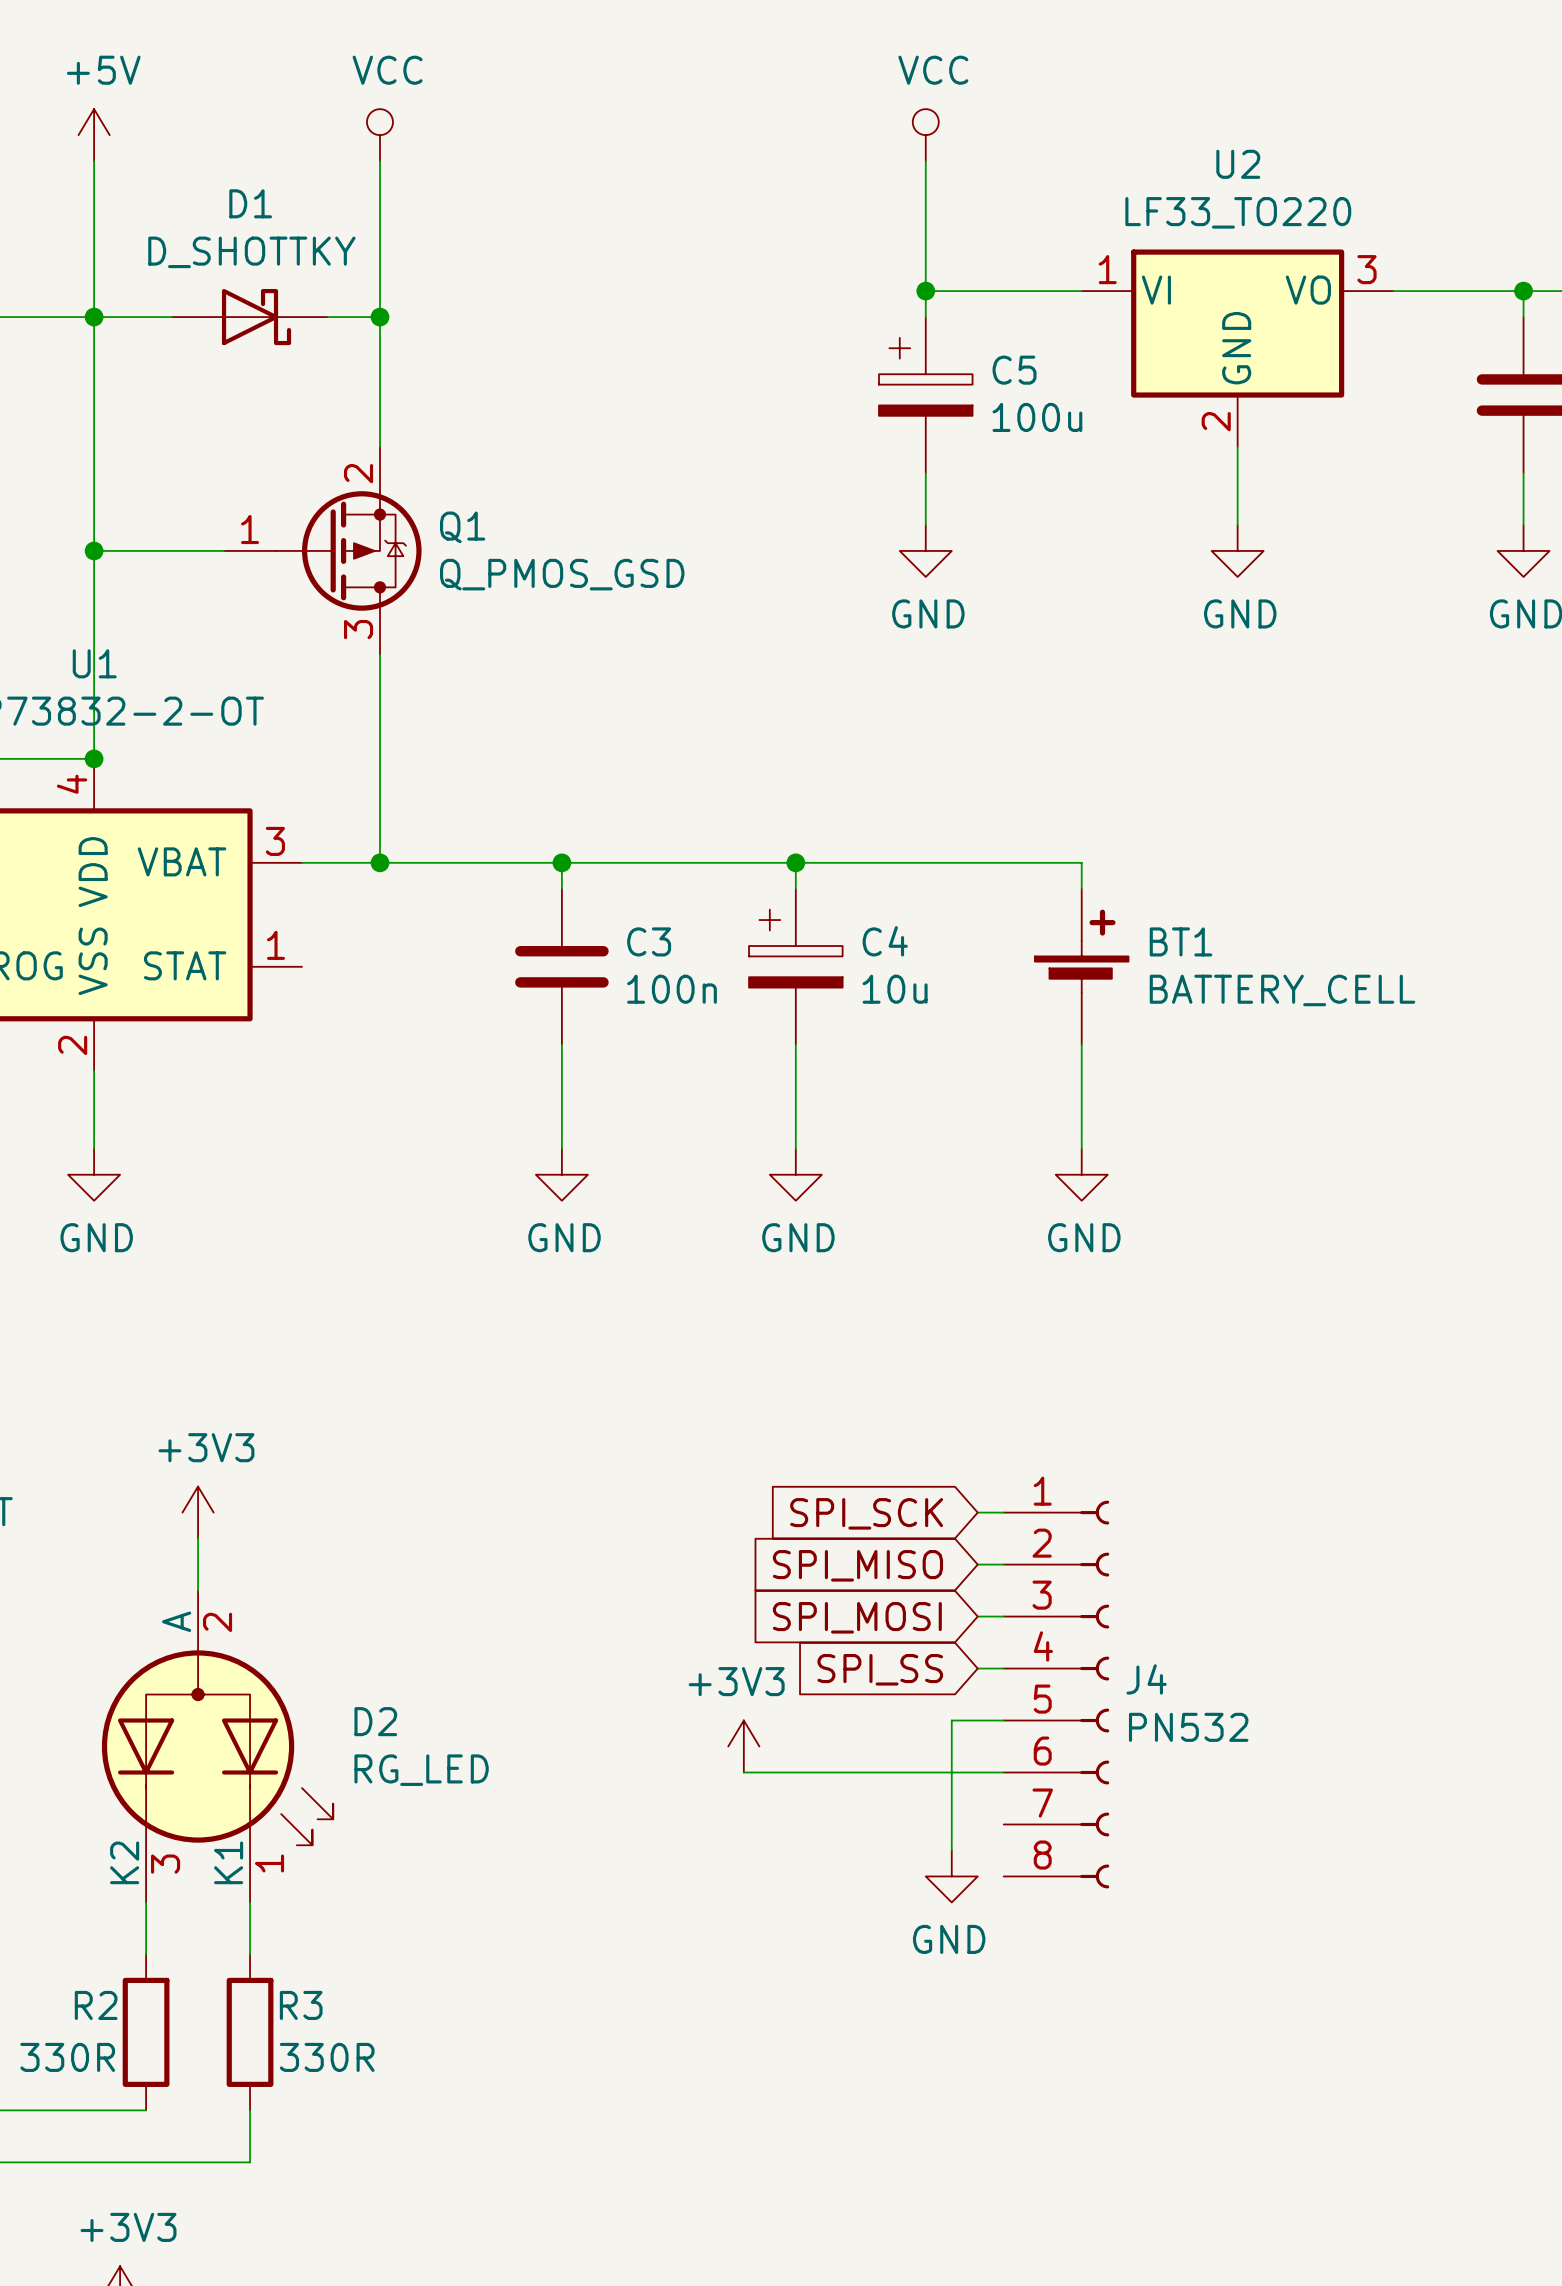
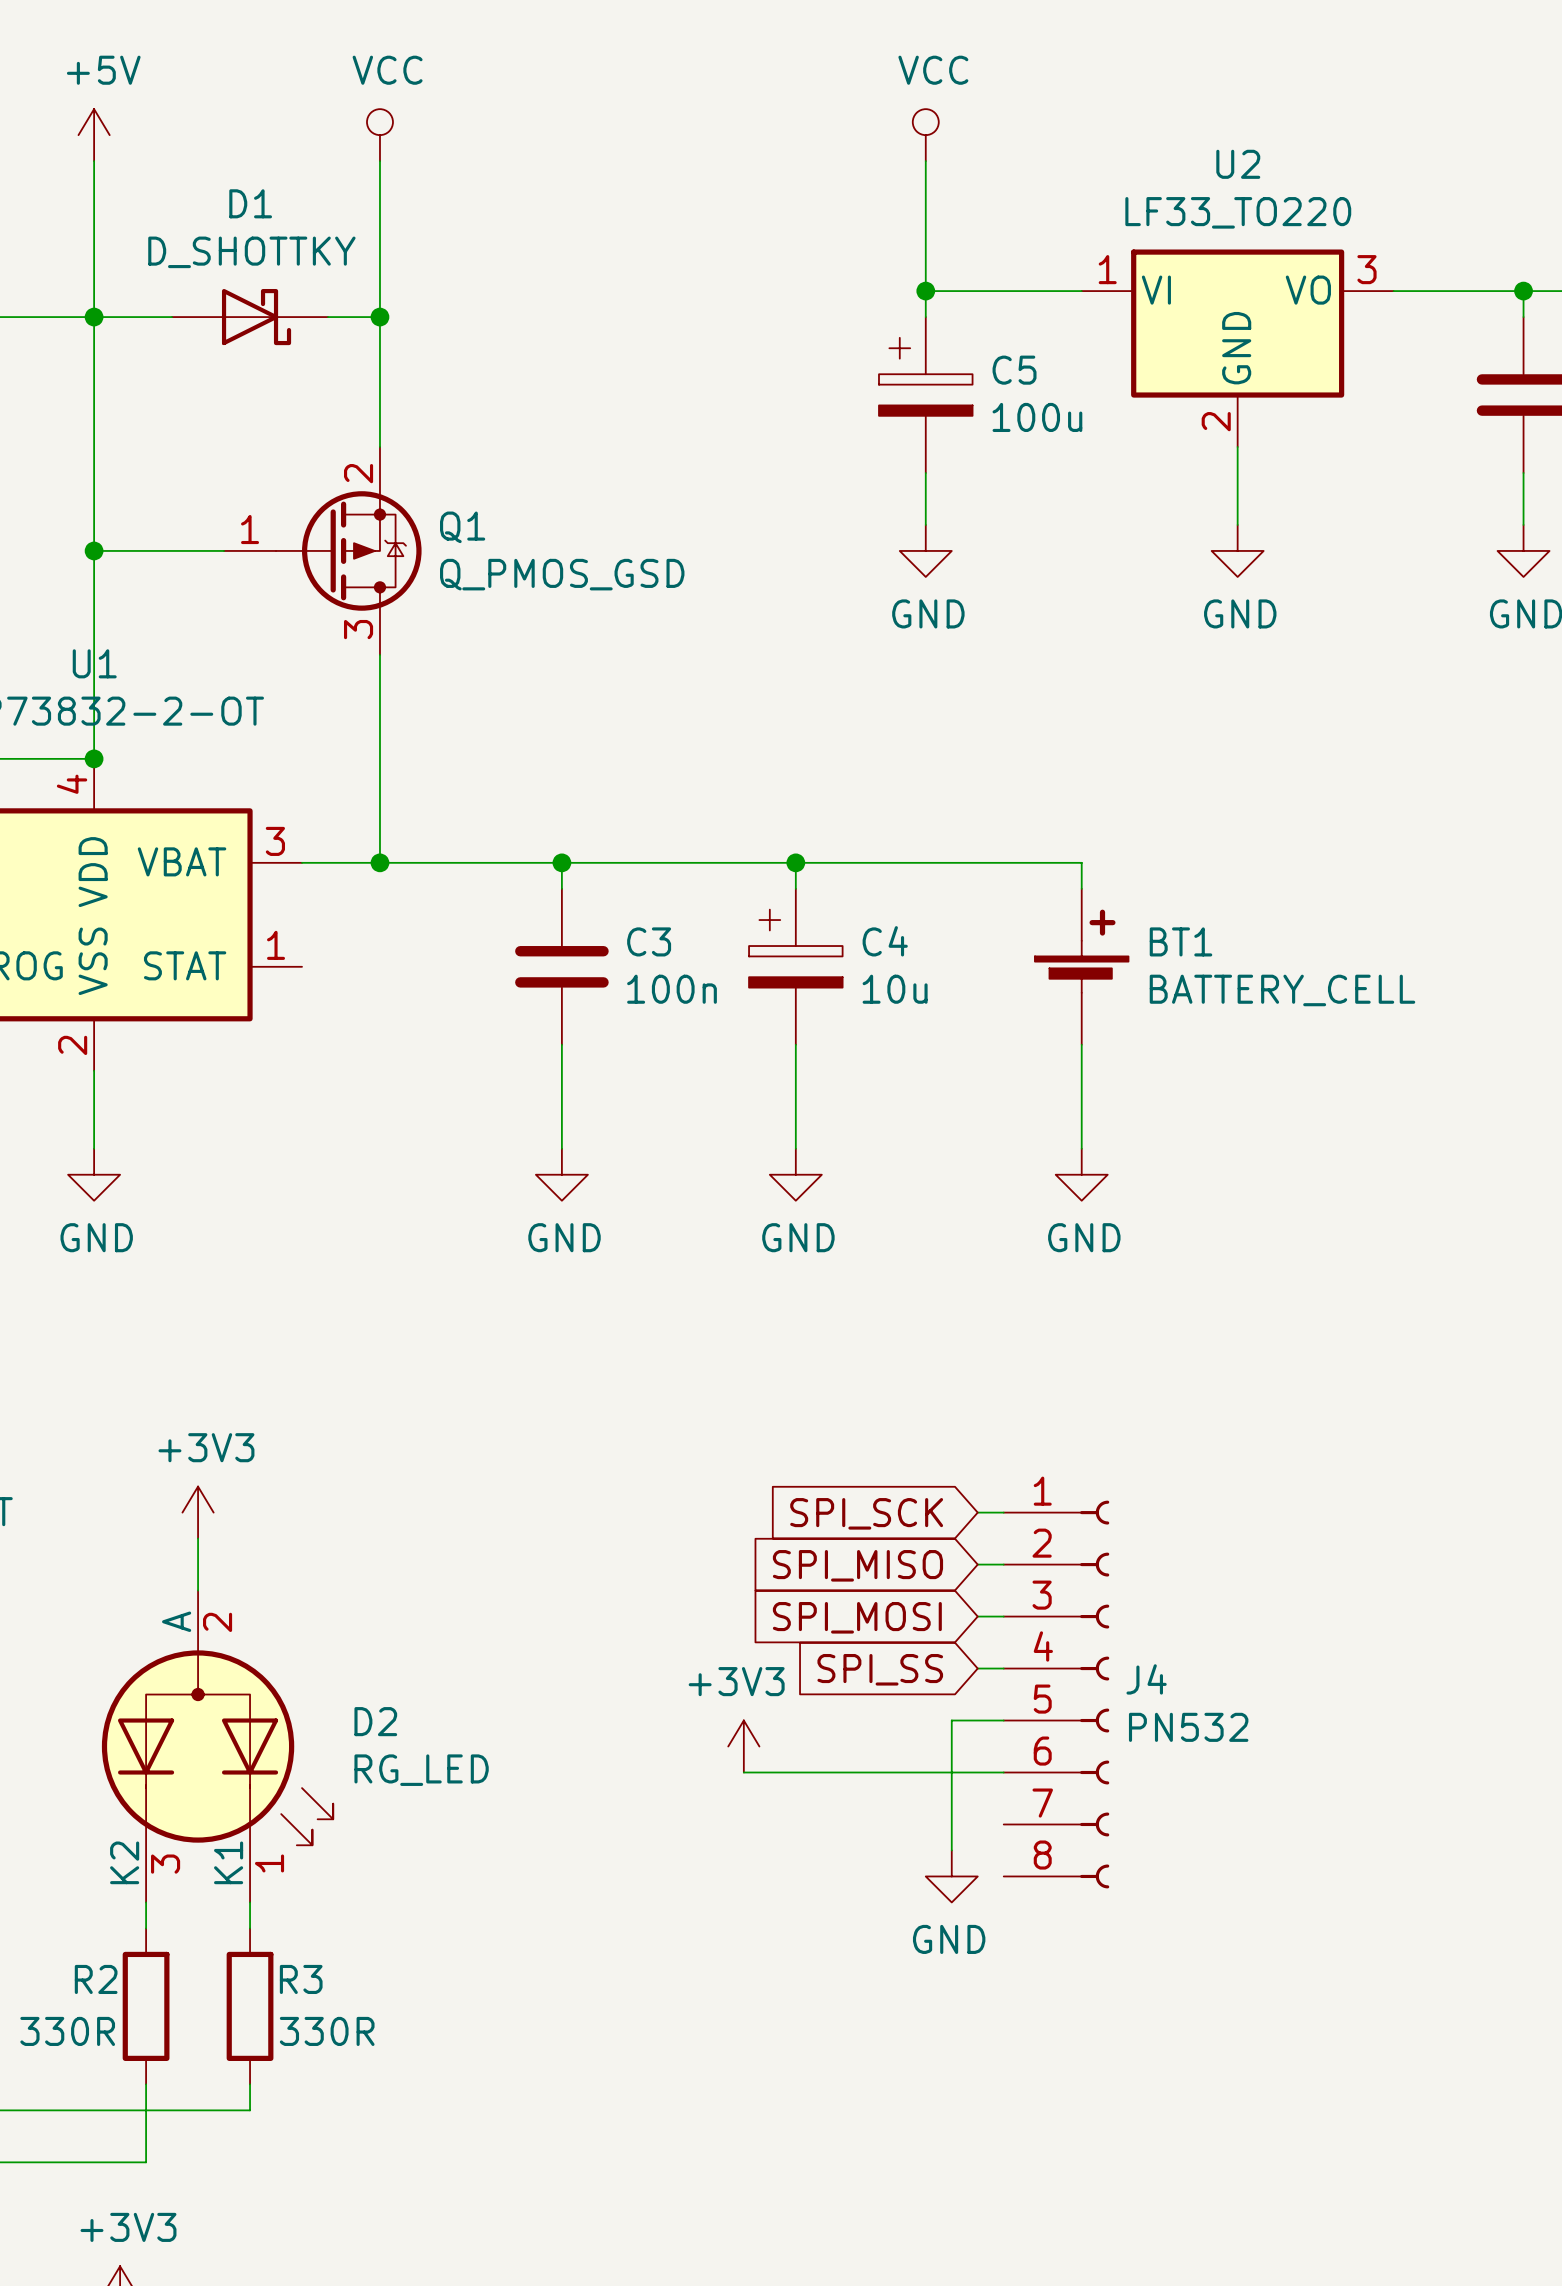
R2 position: (146, 2032) -> (146, 2006)
R3 position: (250, 2032) -> (250, 2006)
wire: none -> (250, 2084) (250, 2110) (146, 2110)
wire: (250, 2110) (250, 2162) (146, 2162) -> (146, 2084) (146, 2162)

